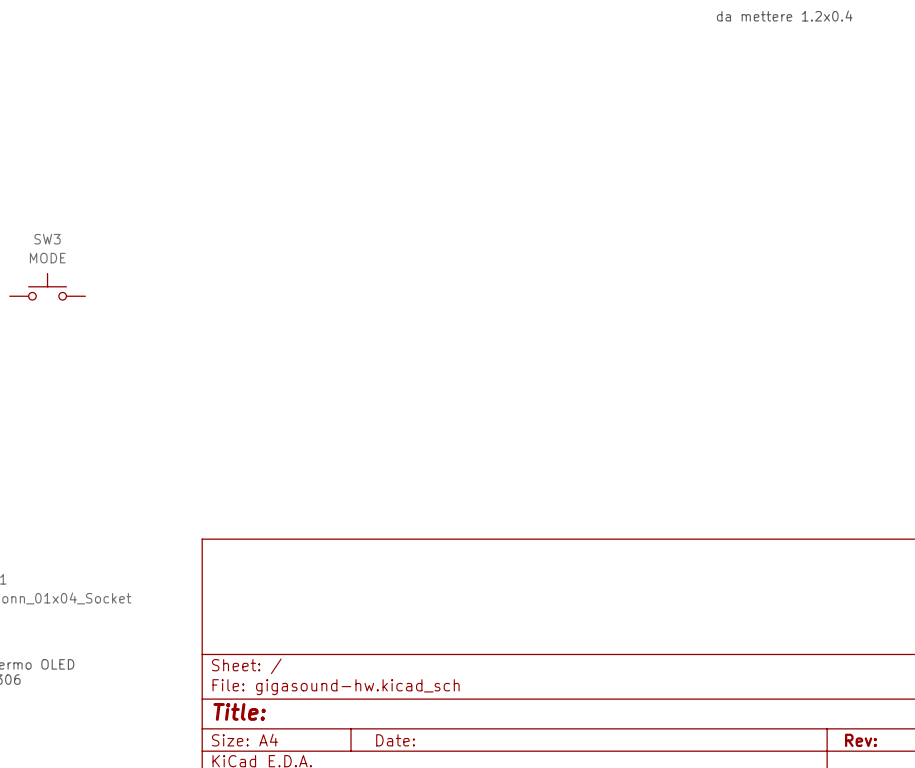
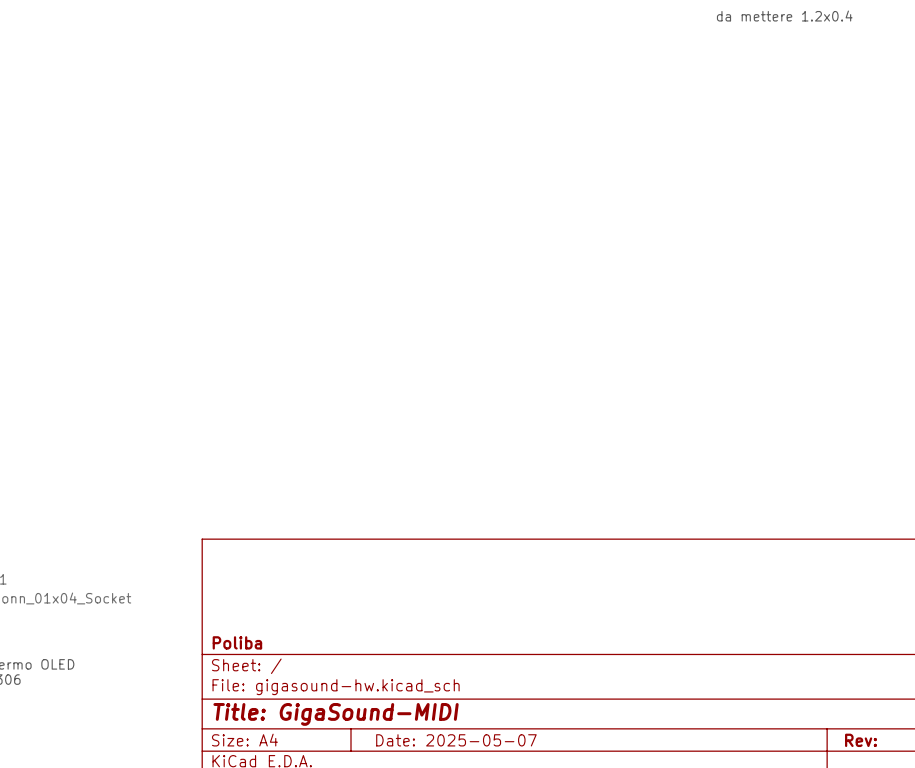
SW3: MODE (47, 286) -> none
title block: none -> Poliba (237, 642)
title block: Title: (239, 711) -> Title: GigaSound-MIDI (336, 714)
title block: Date: (395, 740) -> Date: 2025-05-07 (456, 740)

